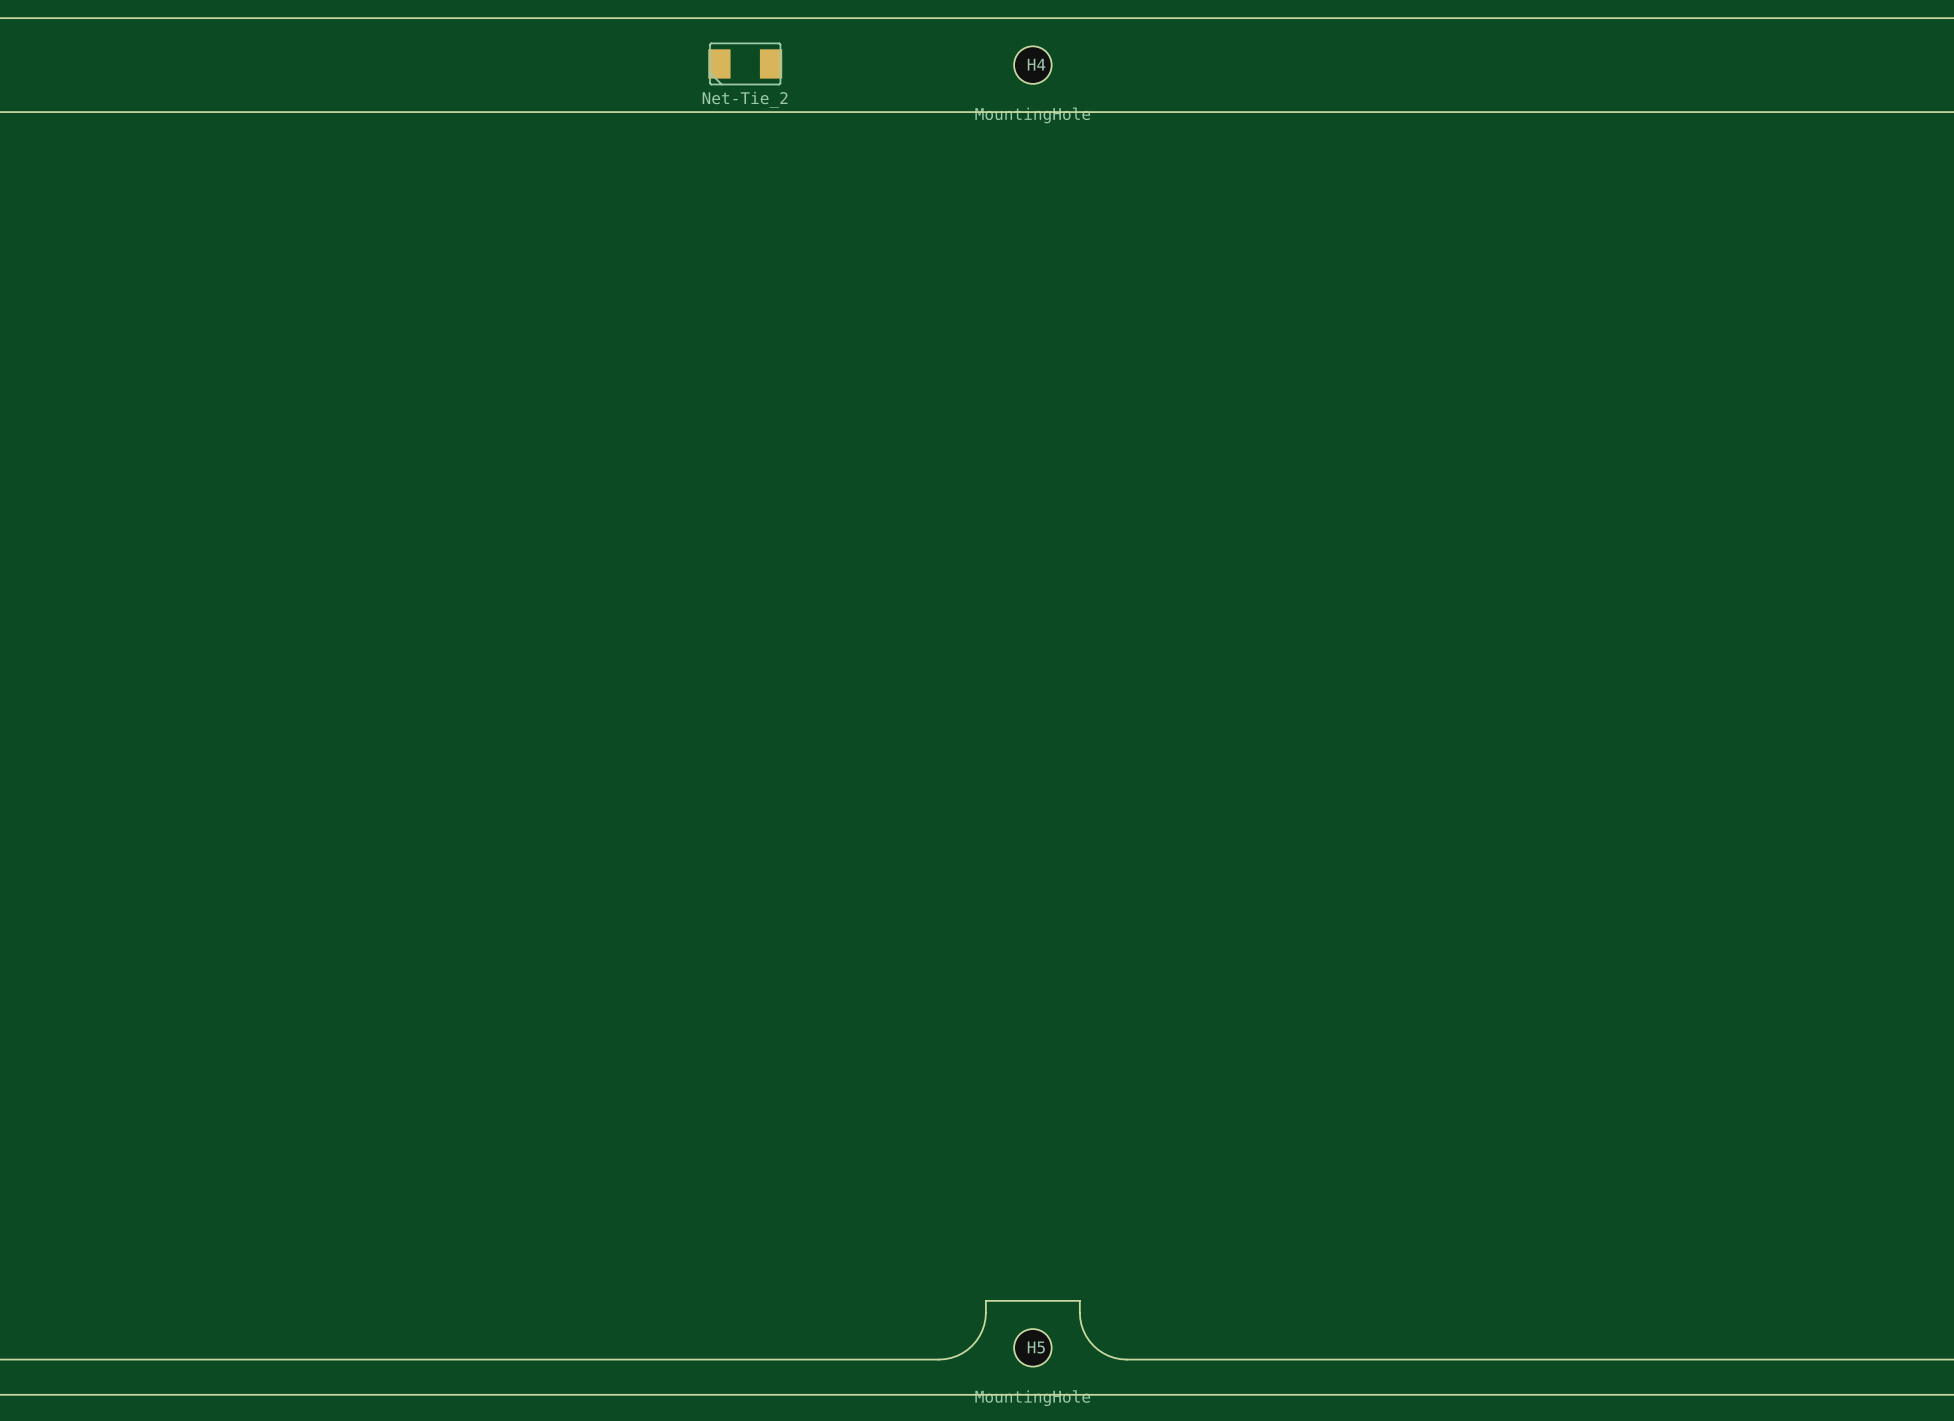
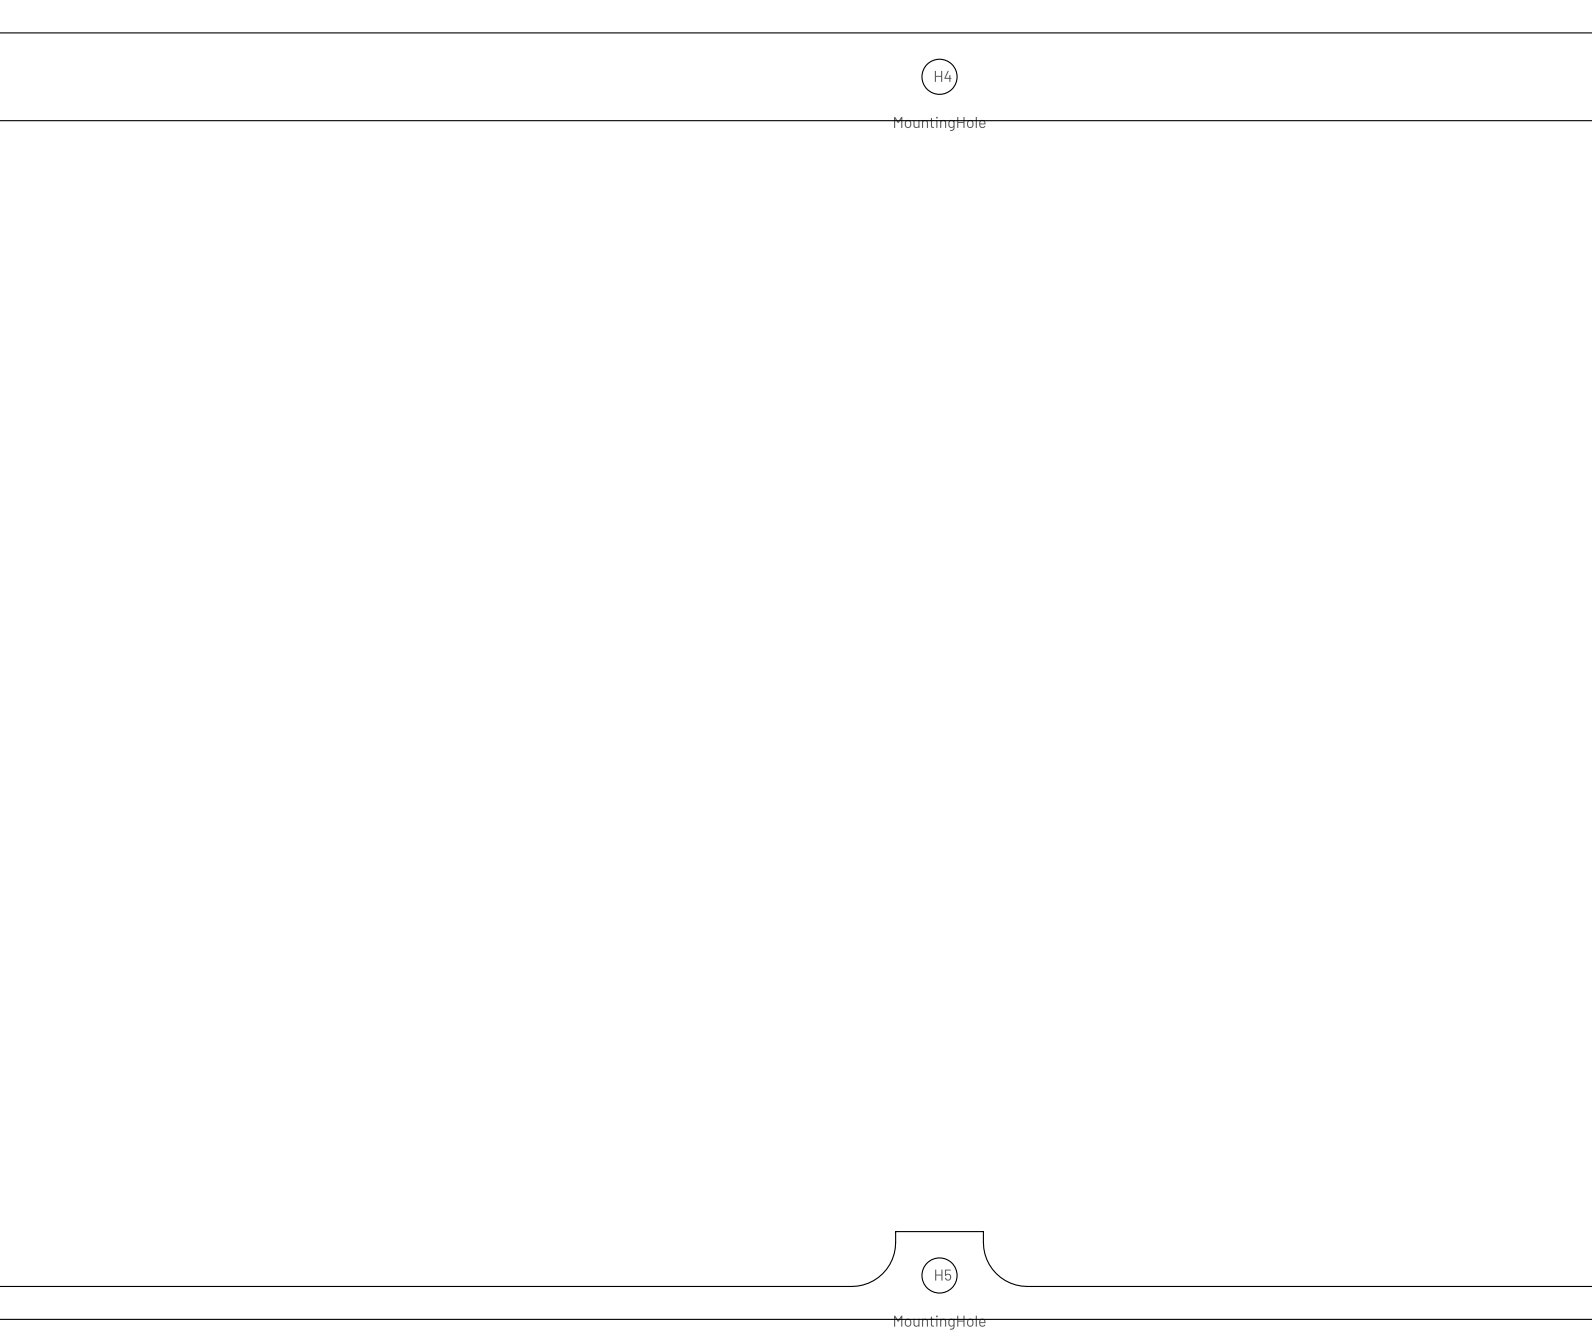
part: Net-Tie_2 (745, 63) -> none

